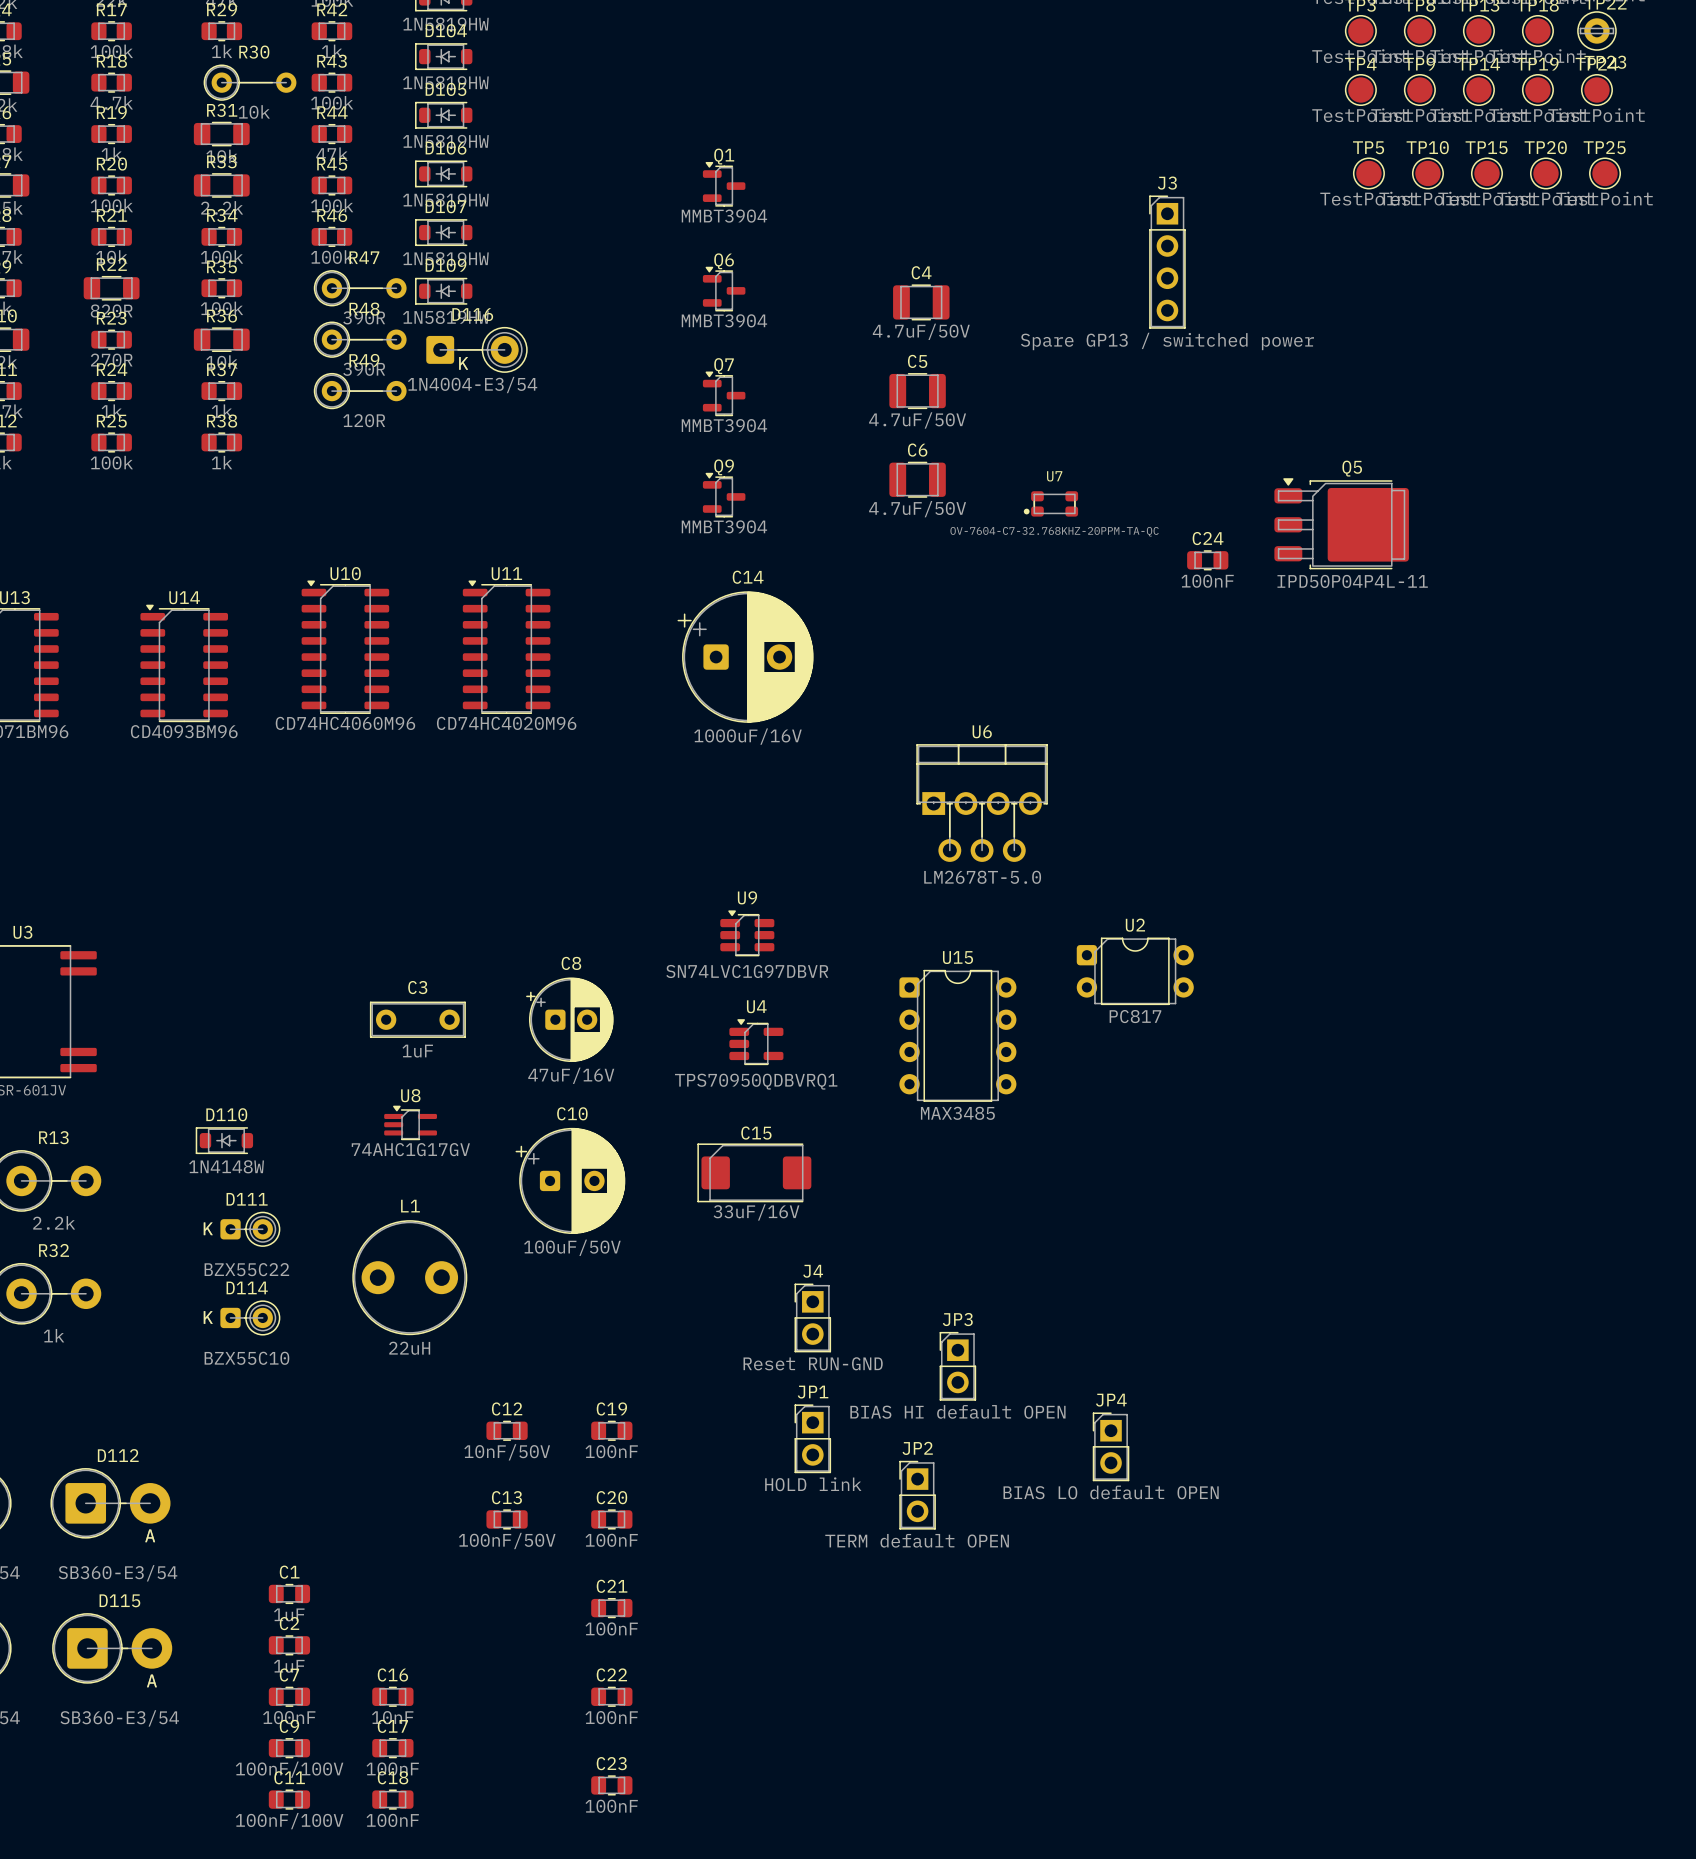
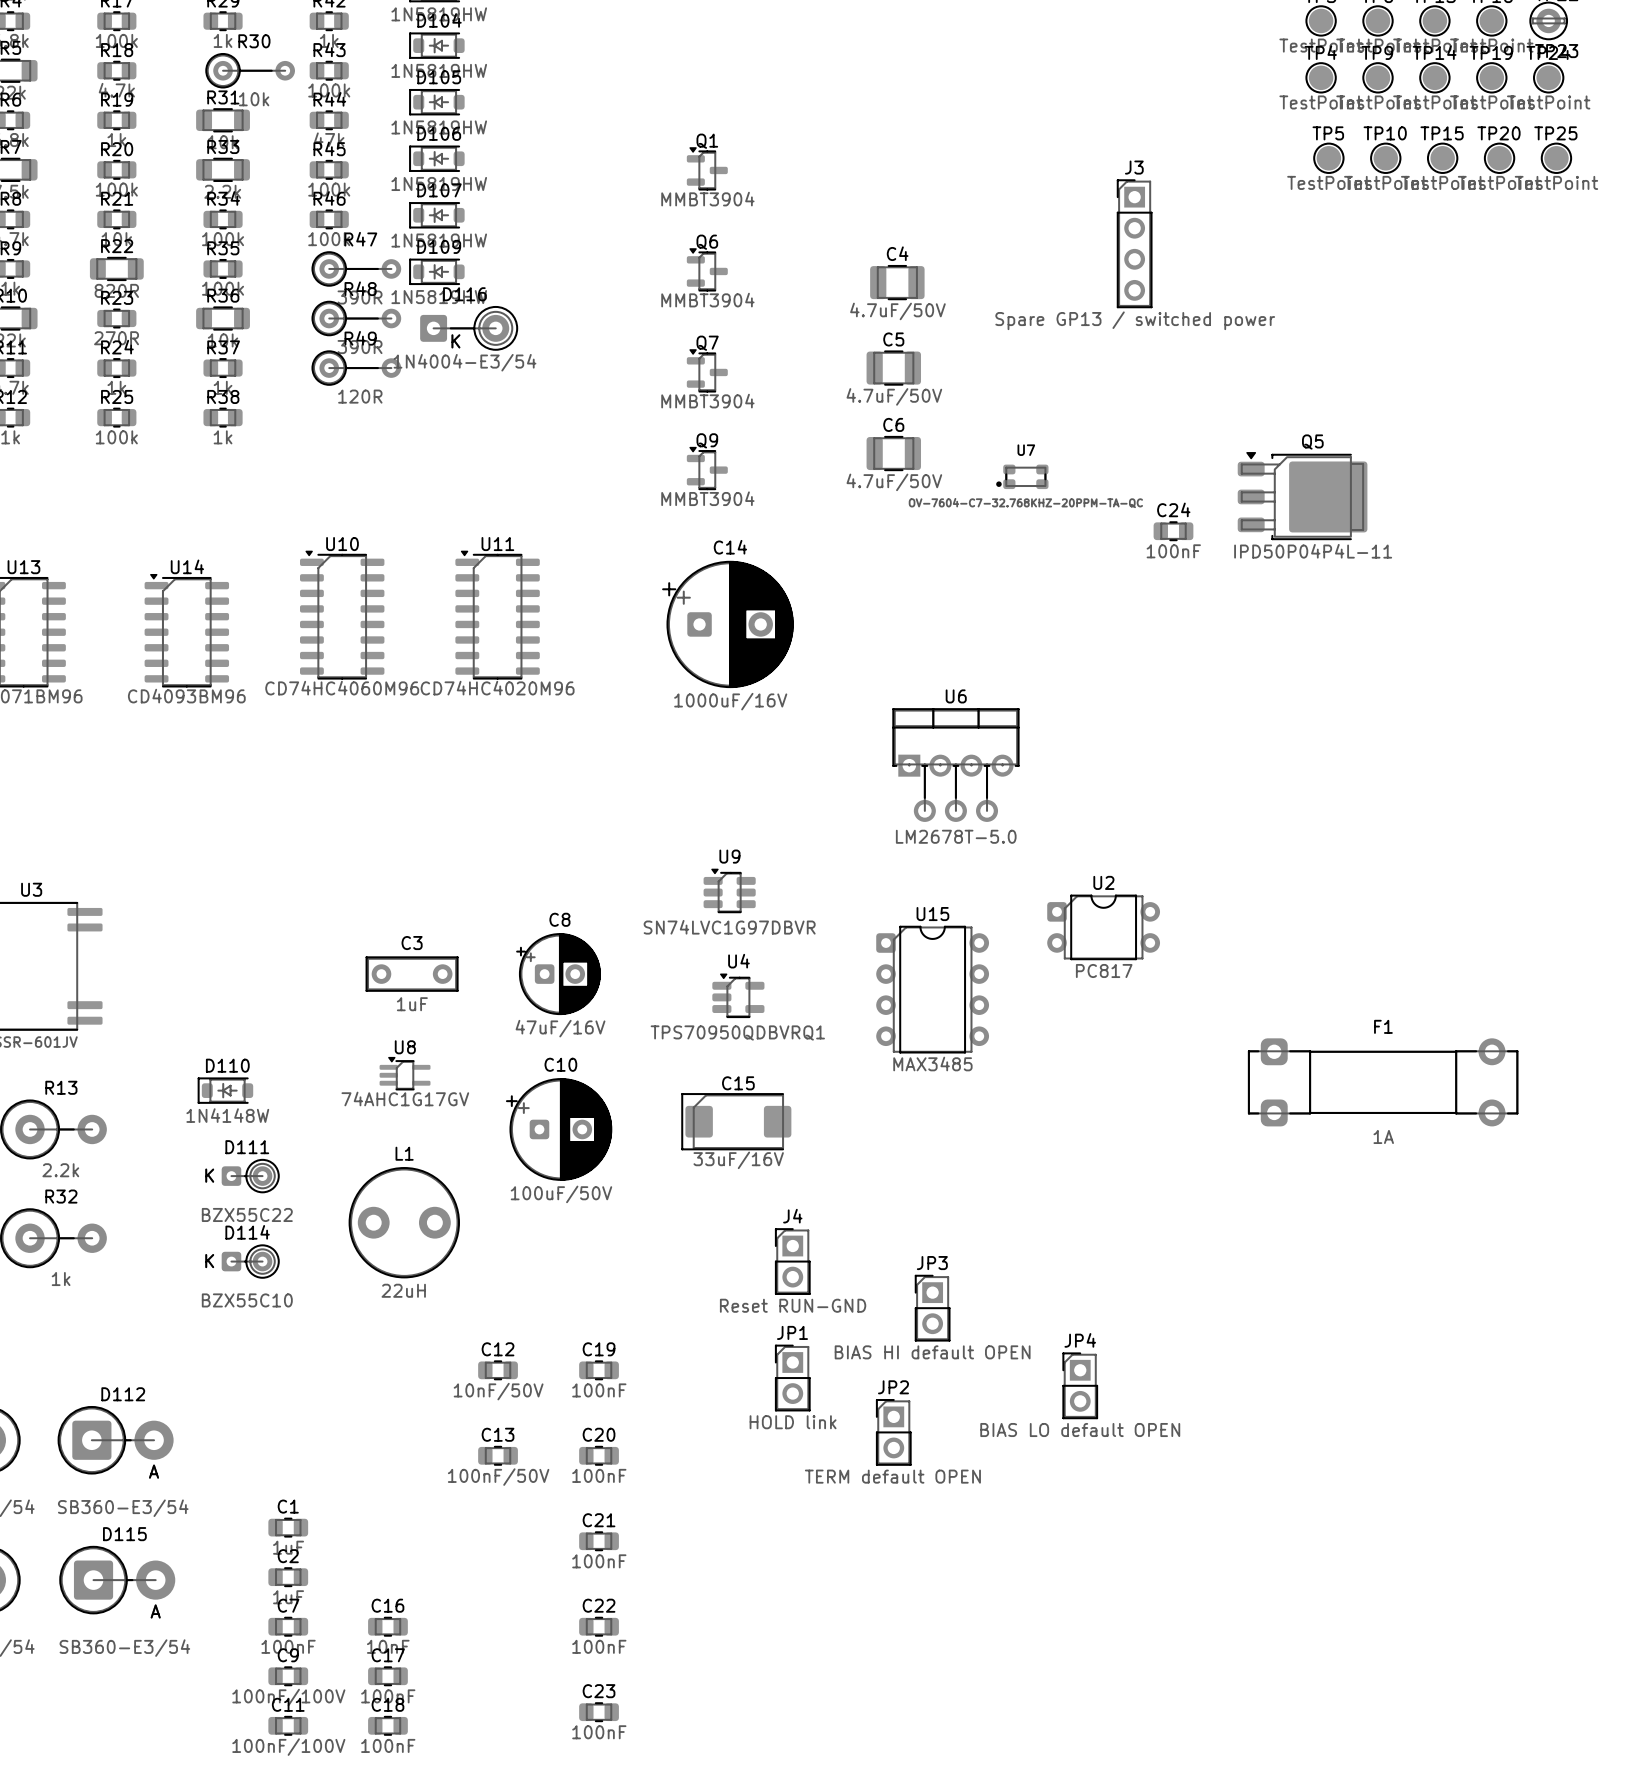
F1: none -> 1A (1383, 1082)

